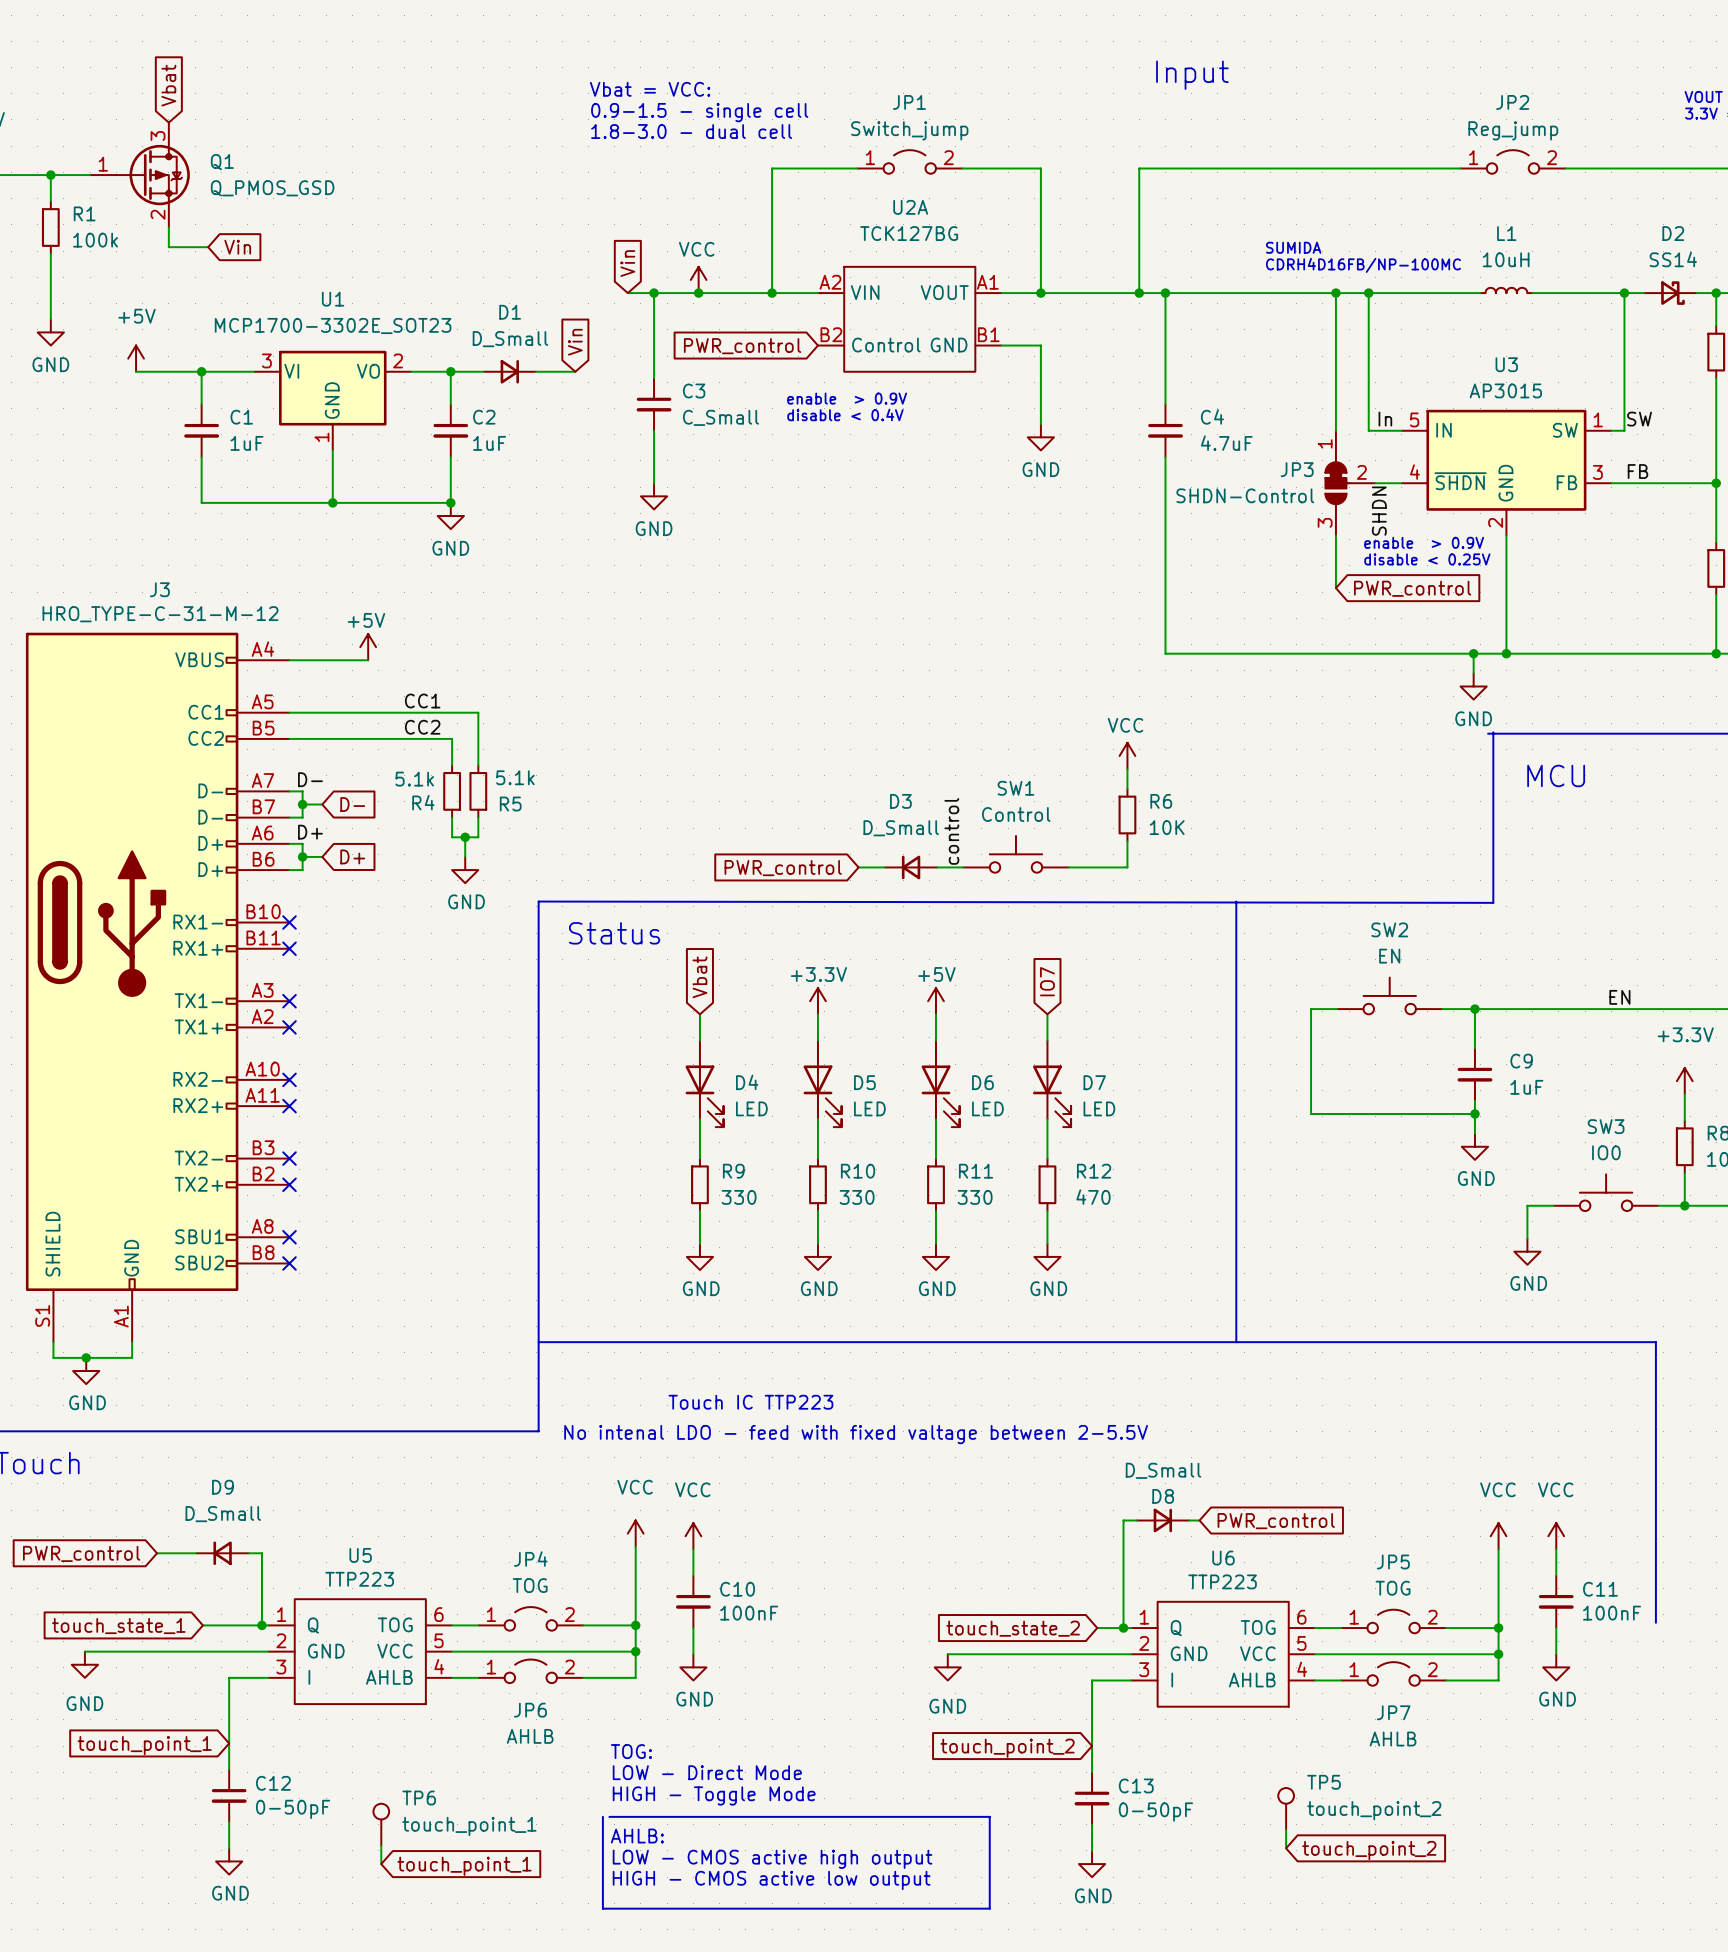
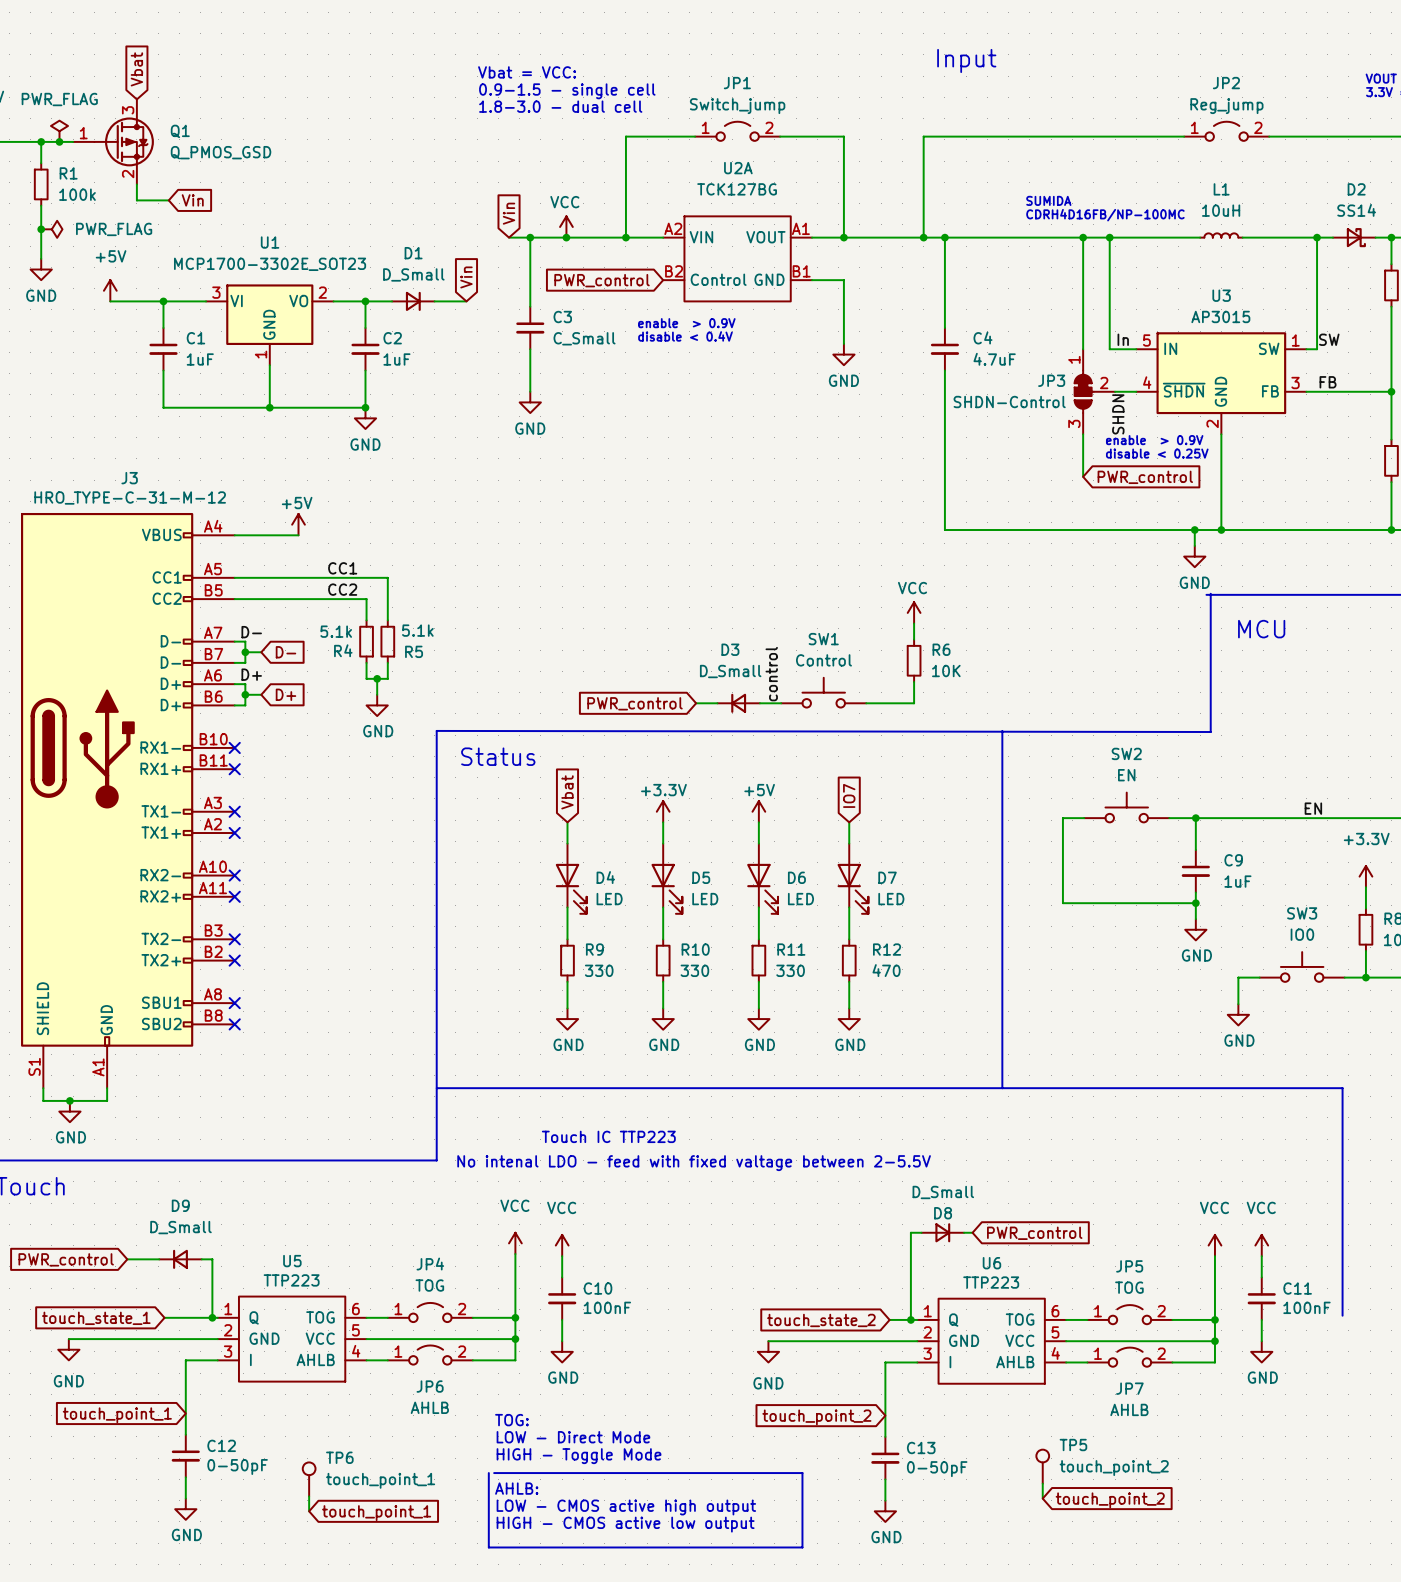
power symbol: none -> PWR_FLAG (59, 131)
junction: none -> (59, 141)
junction: none -> (41, 229)
power symbol: none -> PWR_FLAG (51, 229)

